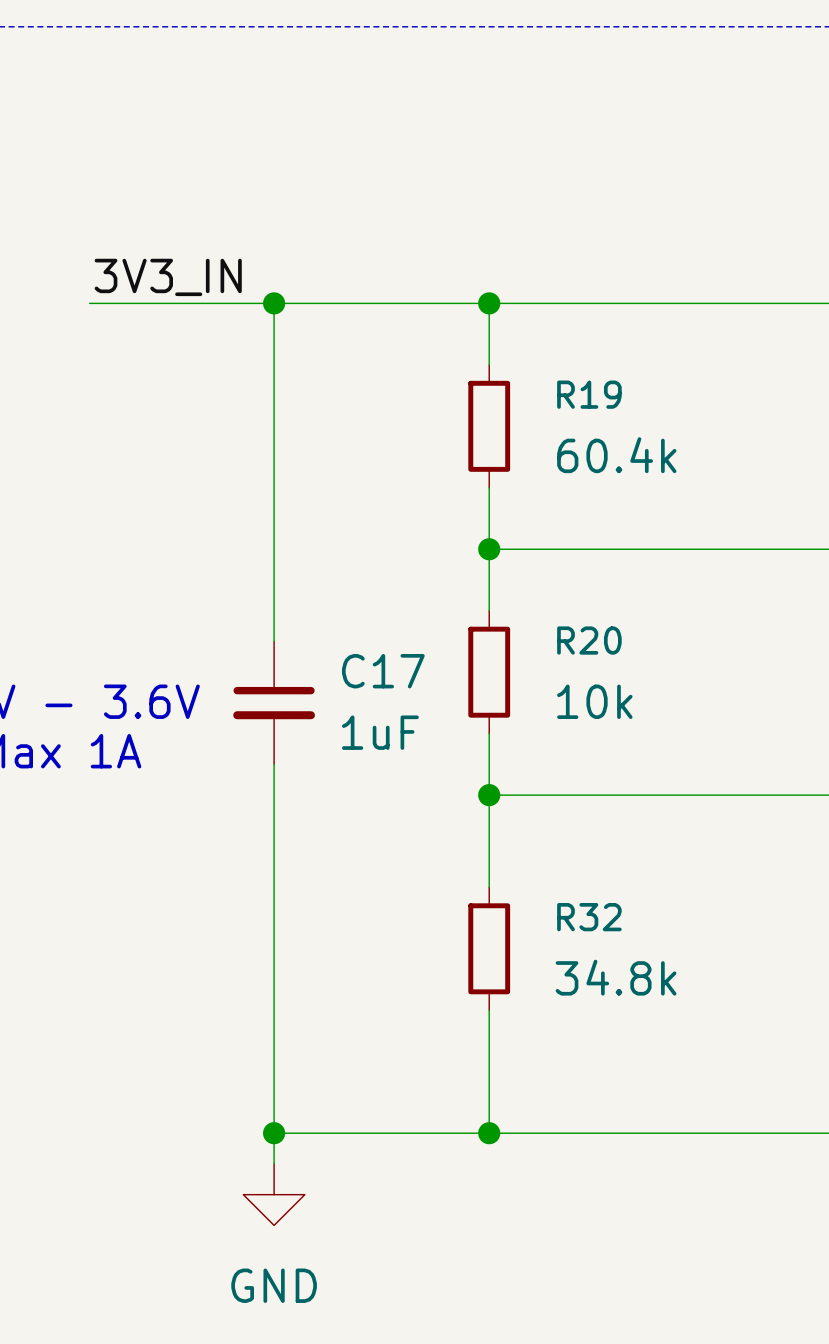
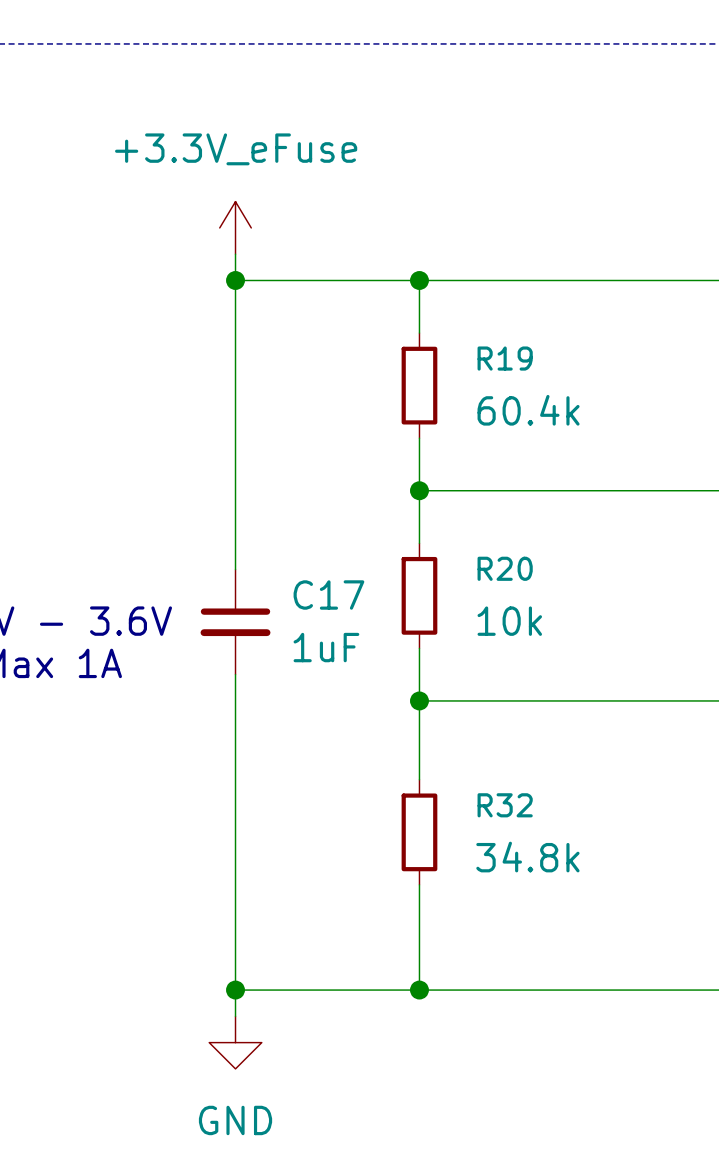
power symbol: none -> +3.3V_eFuse (235, 227)
label: 3V3_IN (168, 277) -> none
wire: (89, 303) (274, 303) -> (235, 254) (235, 280)

